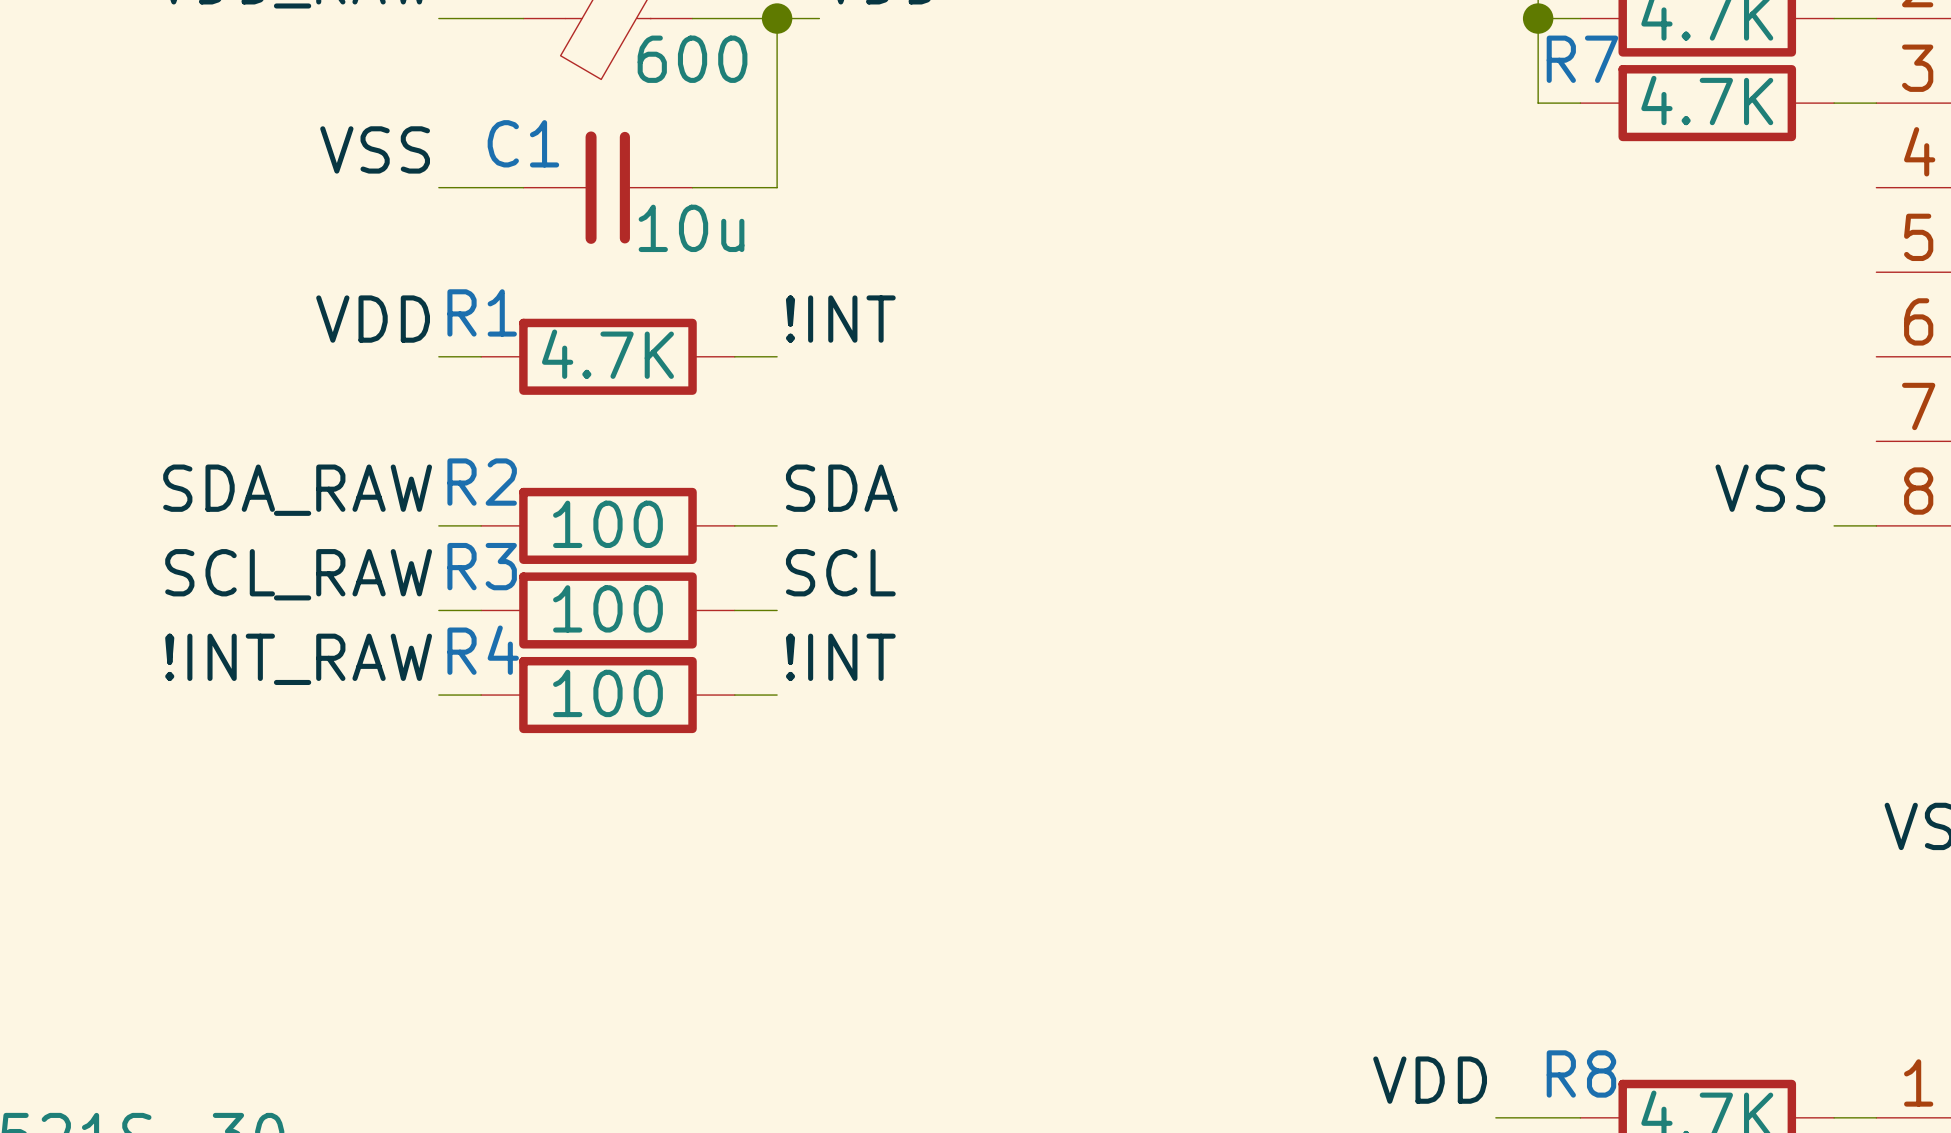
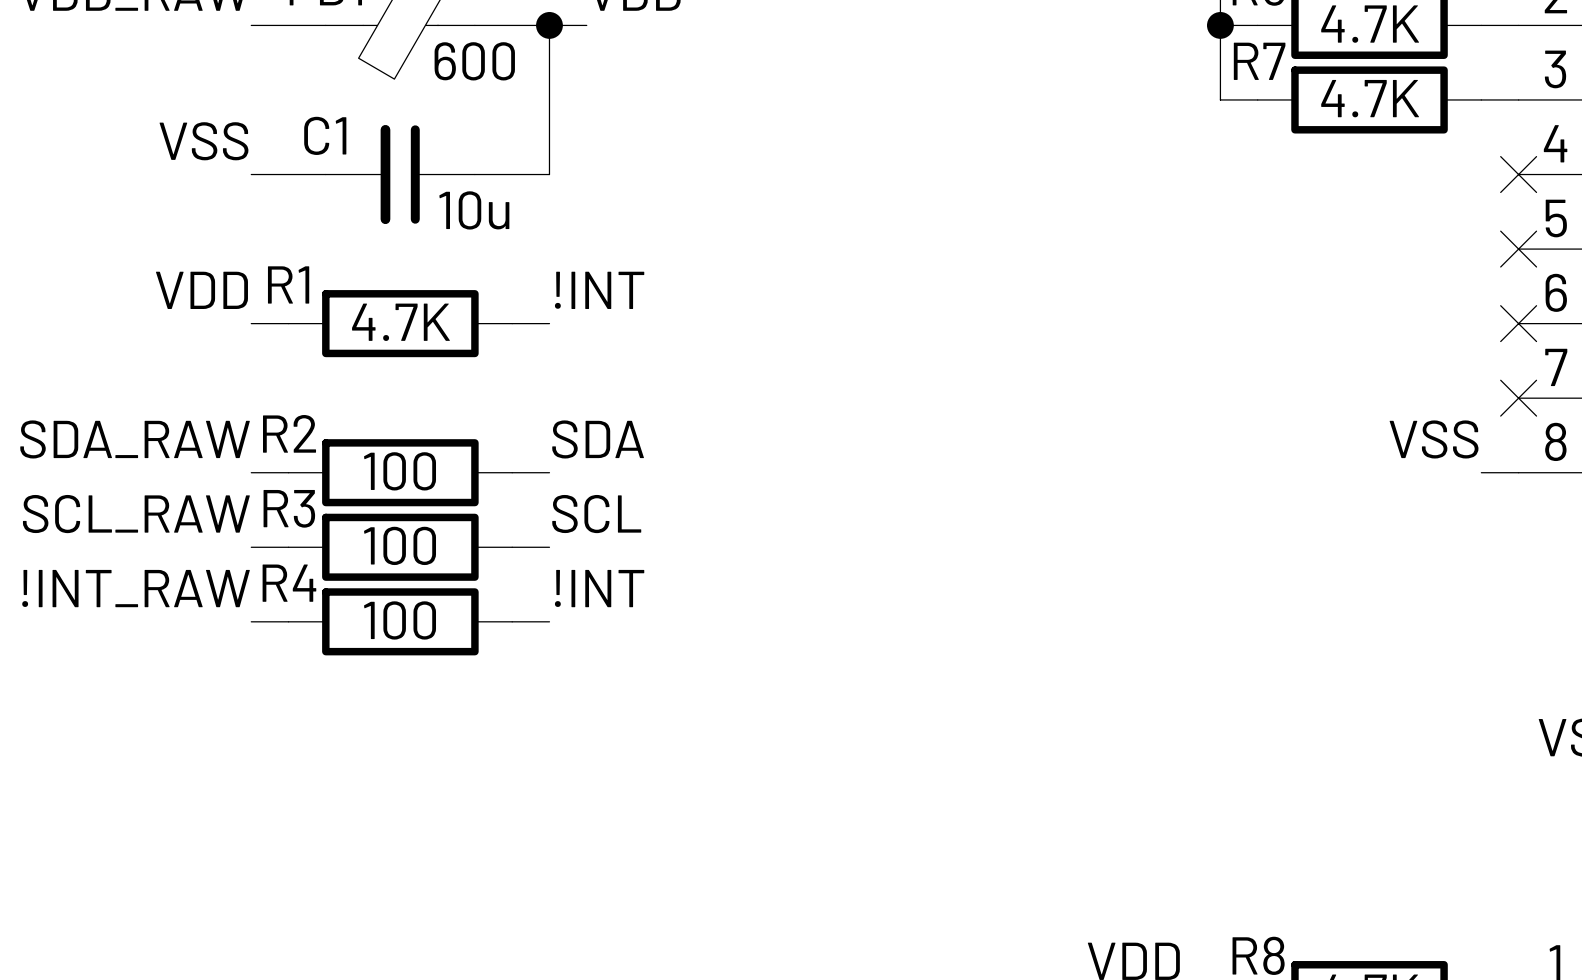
no-connect mark: none -> (1518, 174)
no-connect mark: none -> (1518, 249)
no-connect mark: none -> (1518, 323)
no-connect mark: none -> (1518, 398)

